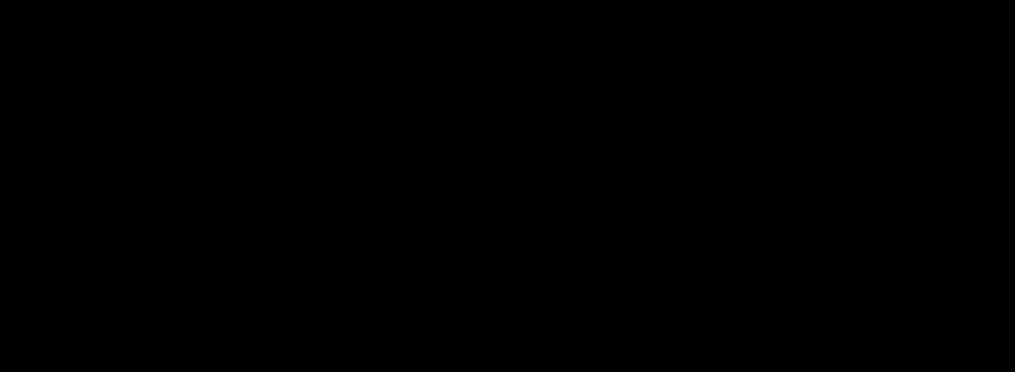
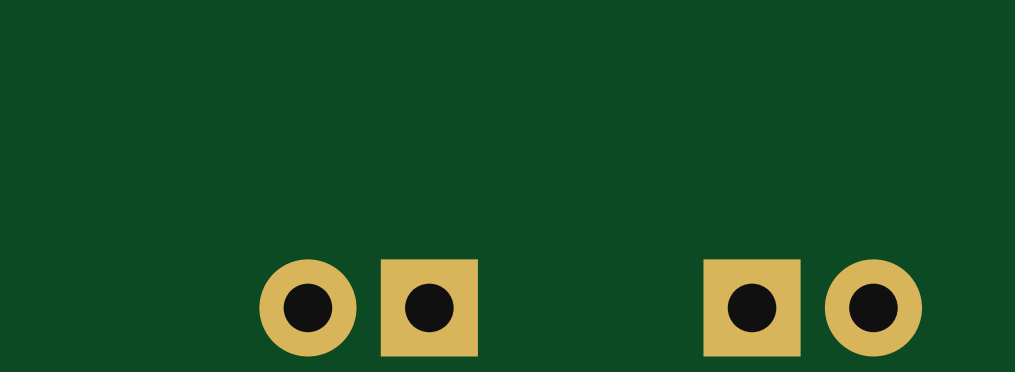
part: none -> (368, 307)
part: none -> (812, 307)

